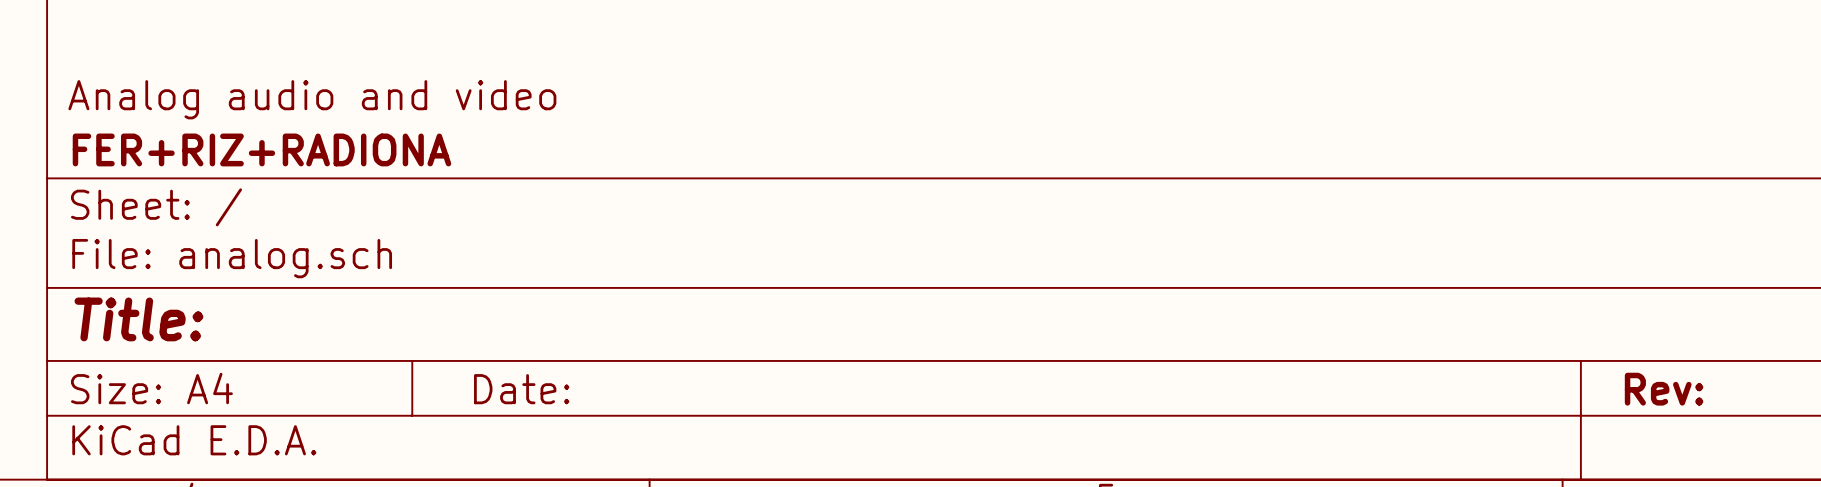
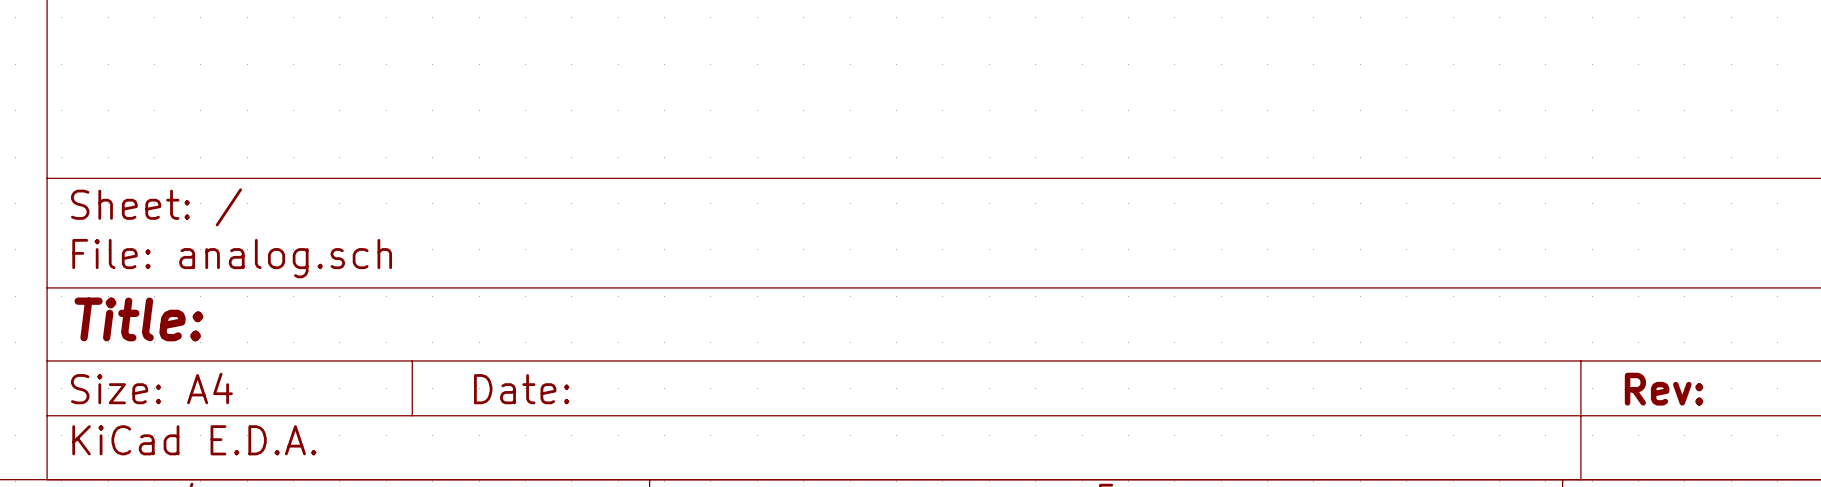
title block: Analog audio and video (312, 99) -> none
title block: FER+RIZ+RADIONA (261, 149) -> none

